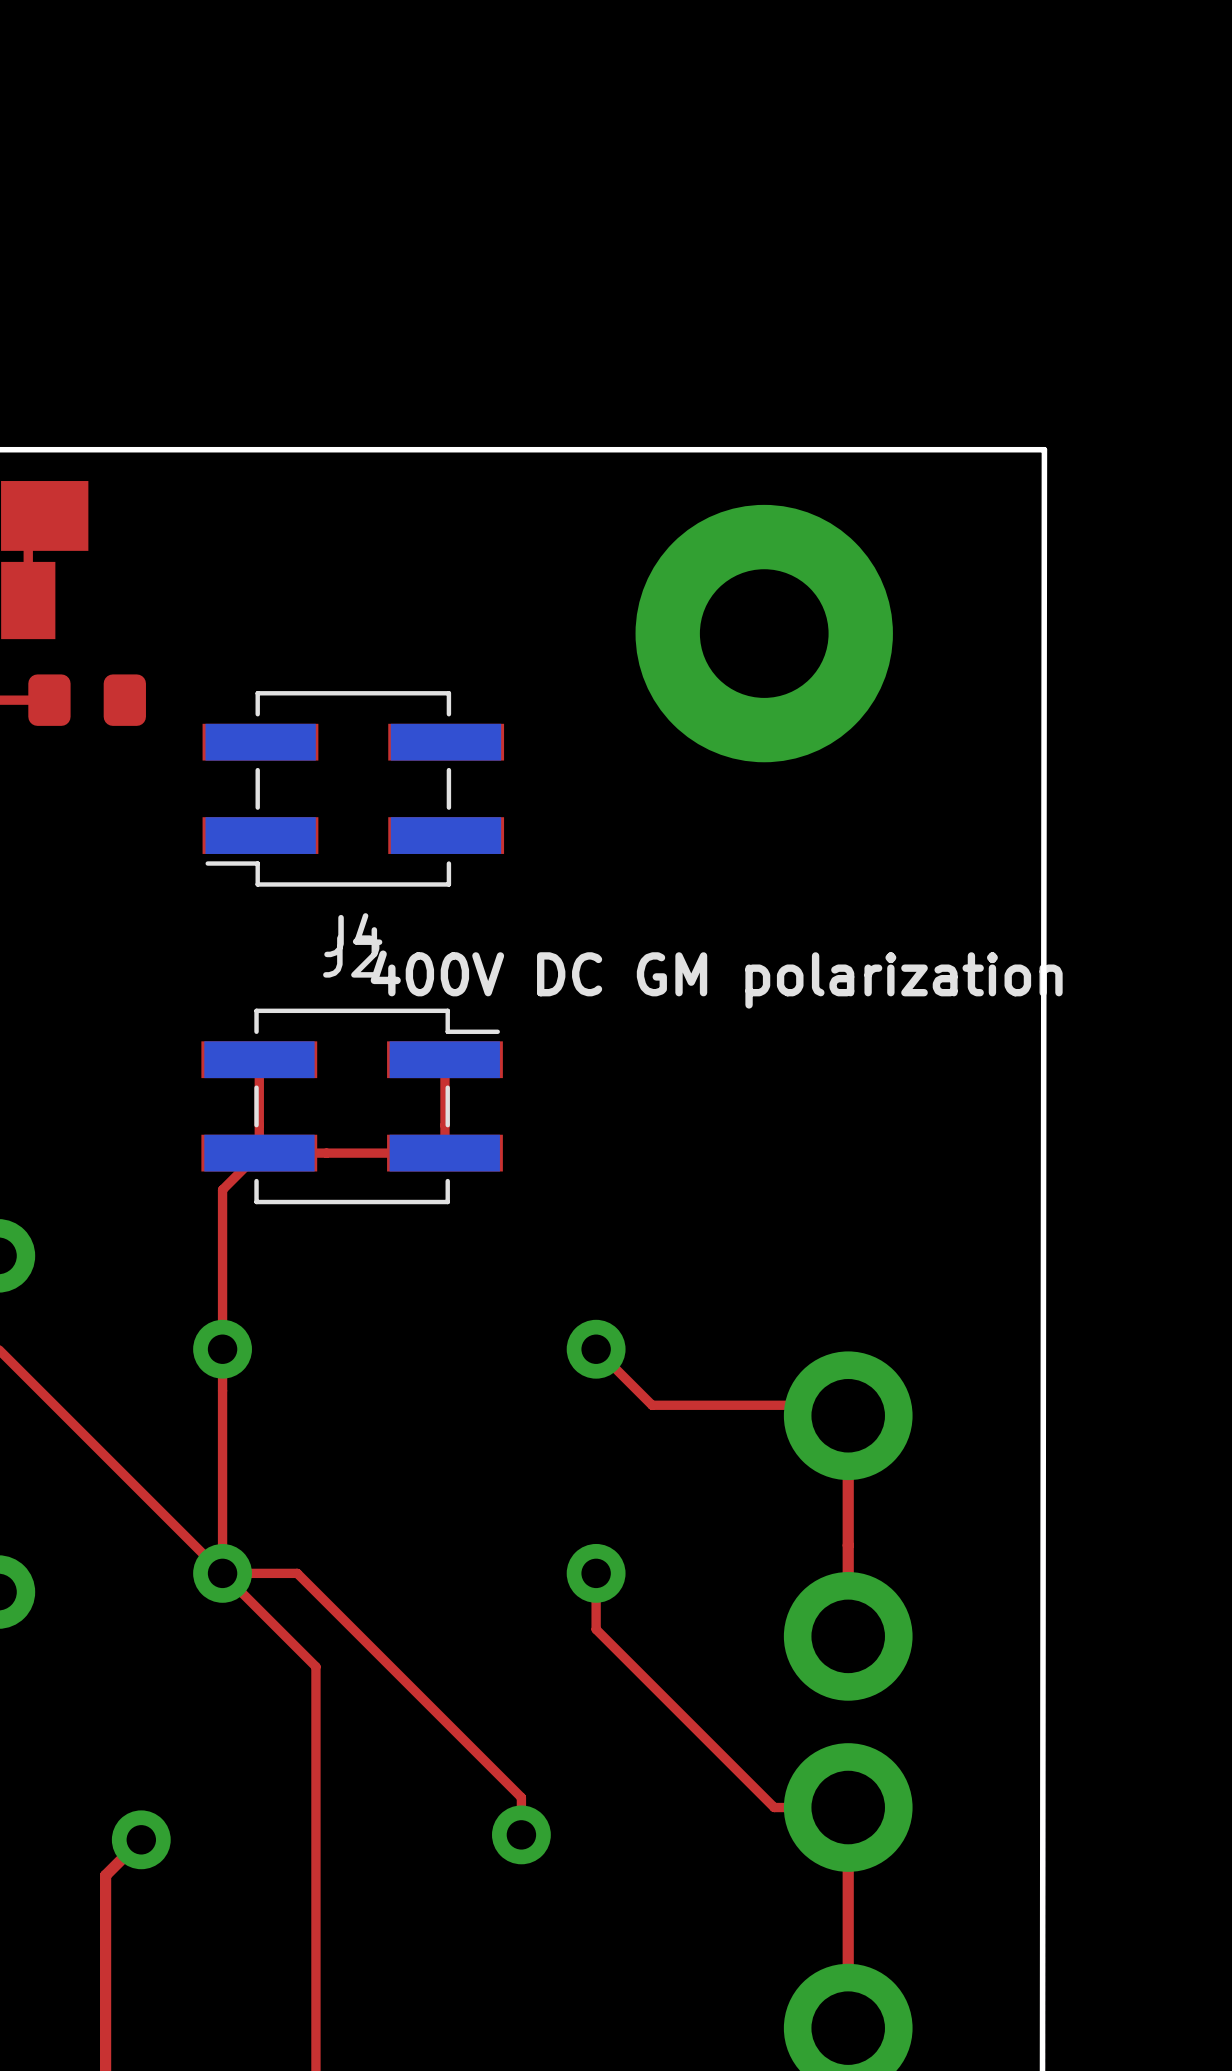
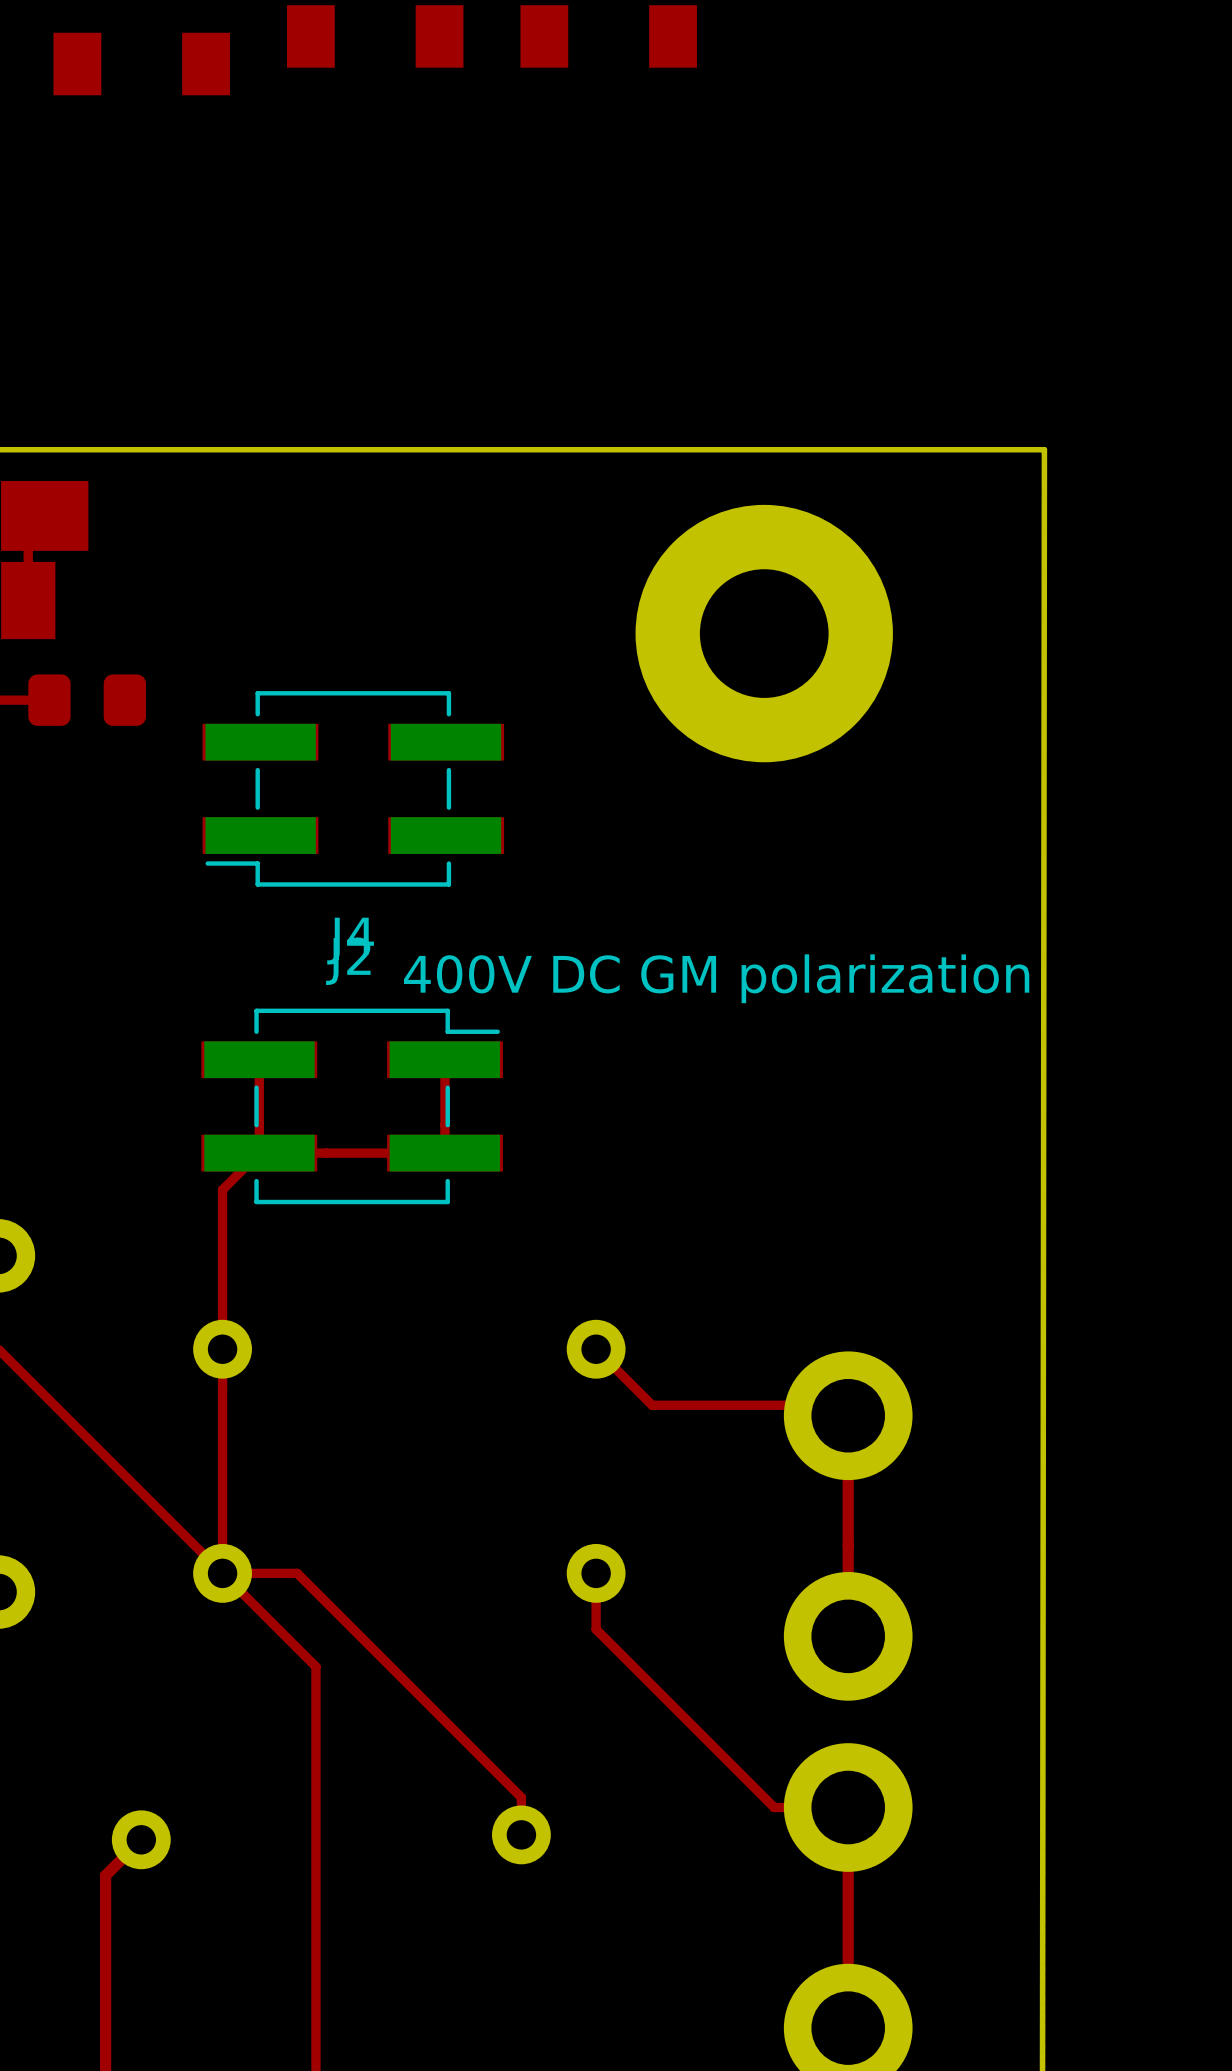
part: none -> (375, 36)
part: none -> (608, 36)
part: none -> (141, 64)

